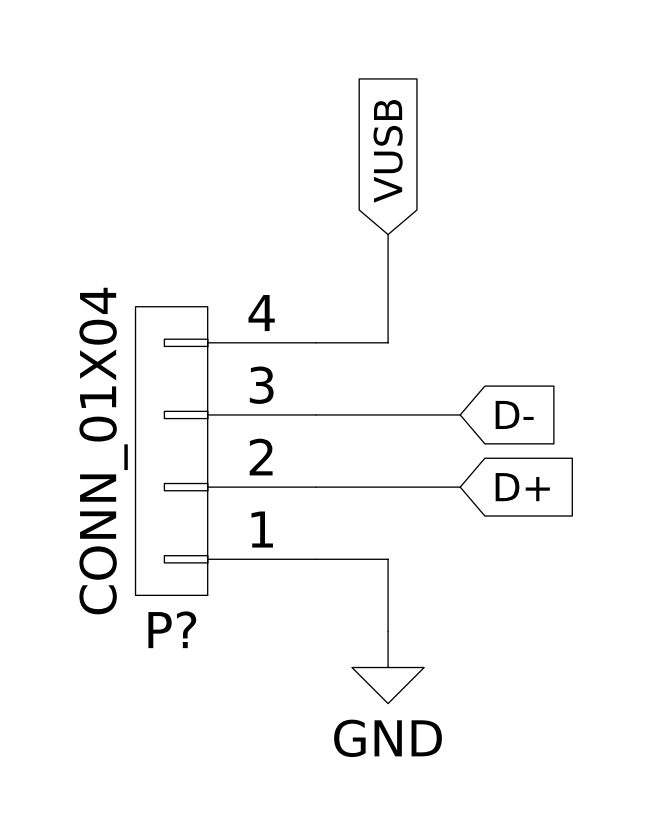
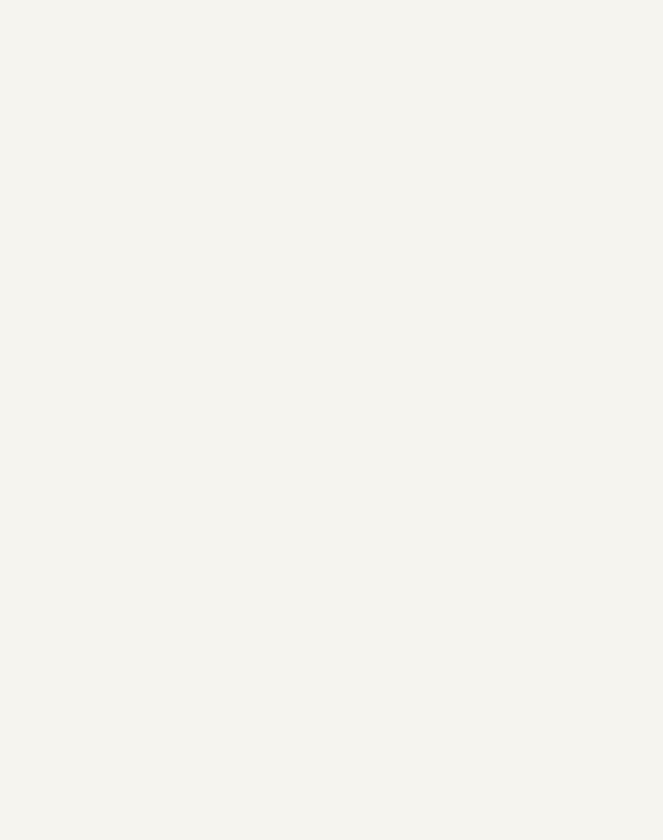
global label: VUSB (388, 151) -> none
wire: (388, 234) (388, 342) (315, 342) -> none
wire: (315, 414) (460, 414) -> none
global label: D- (514, 414) -> none
P?: CONN_01X04 (225, 451) -> none
wire: (315, 487) (460, 487) -> none
global label: D+ (522, 487) -> none
wire: (315, 559) (388, 559) (388, 631) -> none
power symbol: GND (388, 667) -> none

